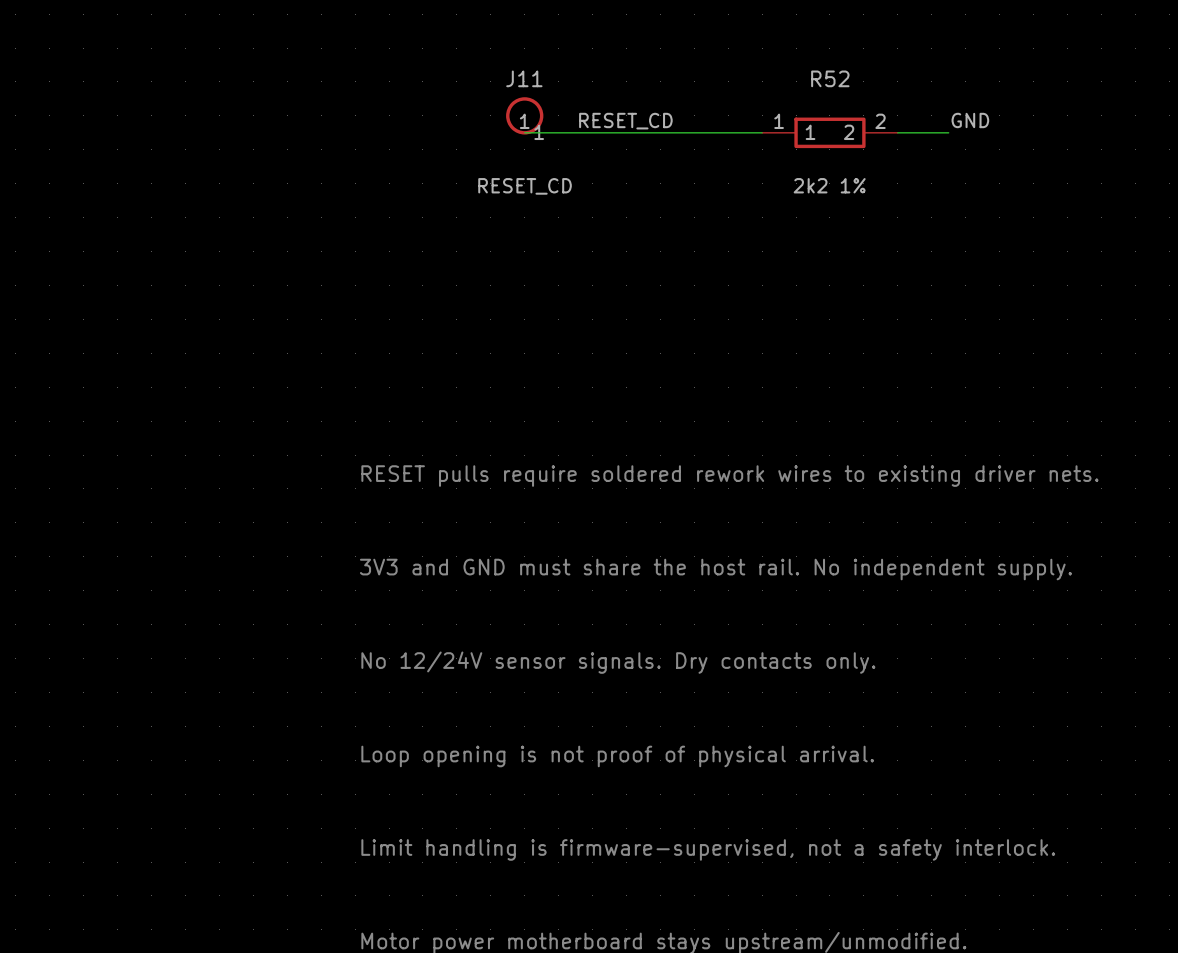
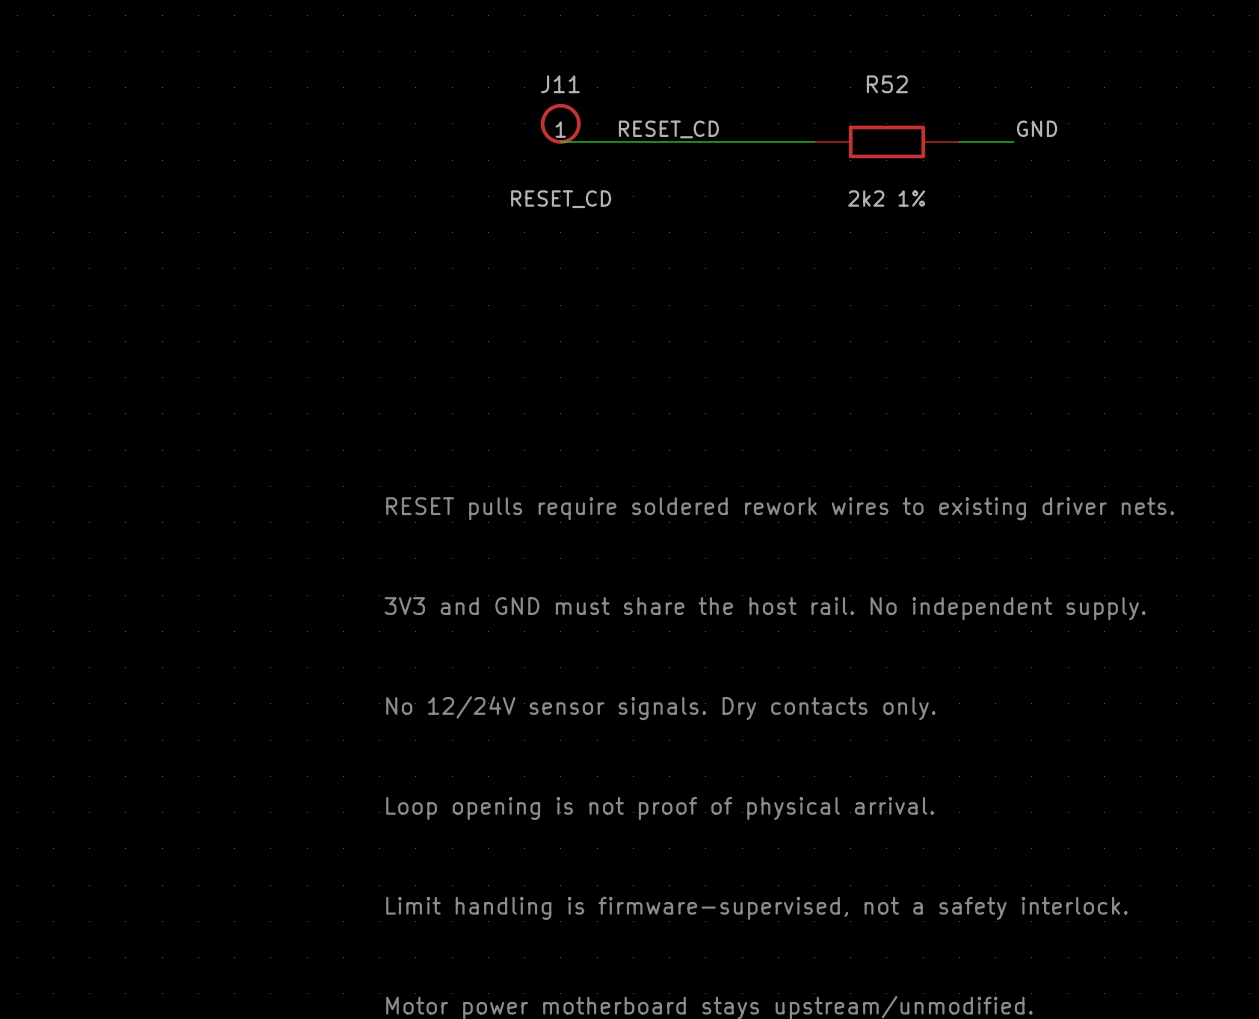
R52 pin number: 1 (779, 121) -> none
R52 pin number: 2 (880, 121) -> none
J11 pin name: 1 (539, 132) -> none
R52 pin name: 1 (810, 132) -> none
R52 pin name: 2 (849, 132) -> none

